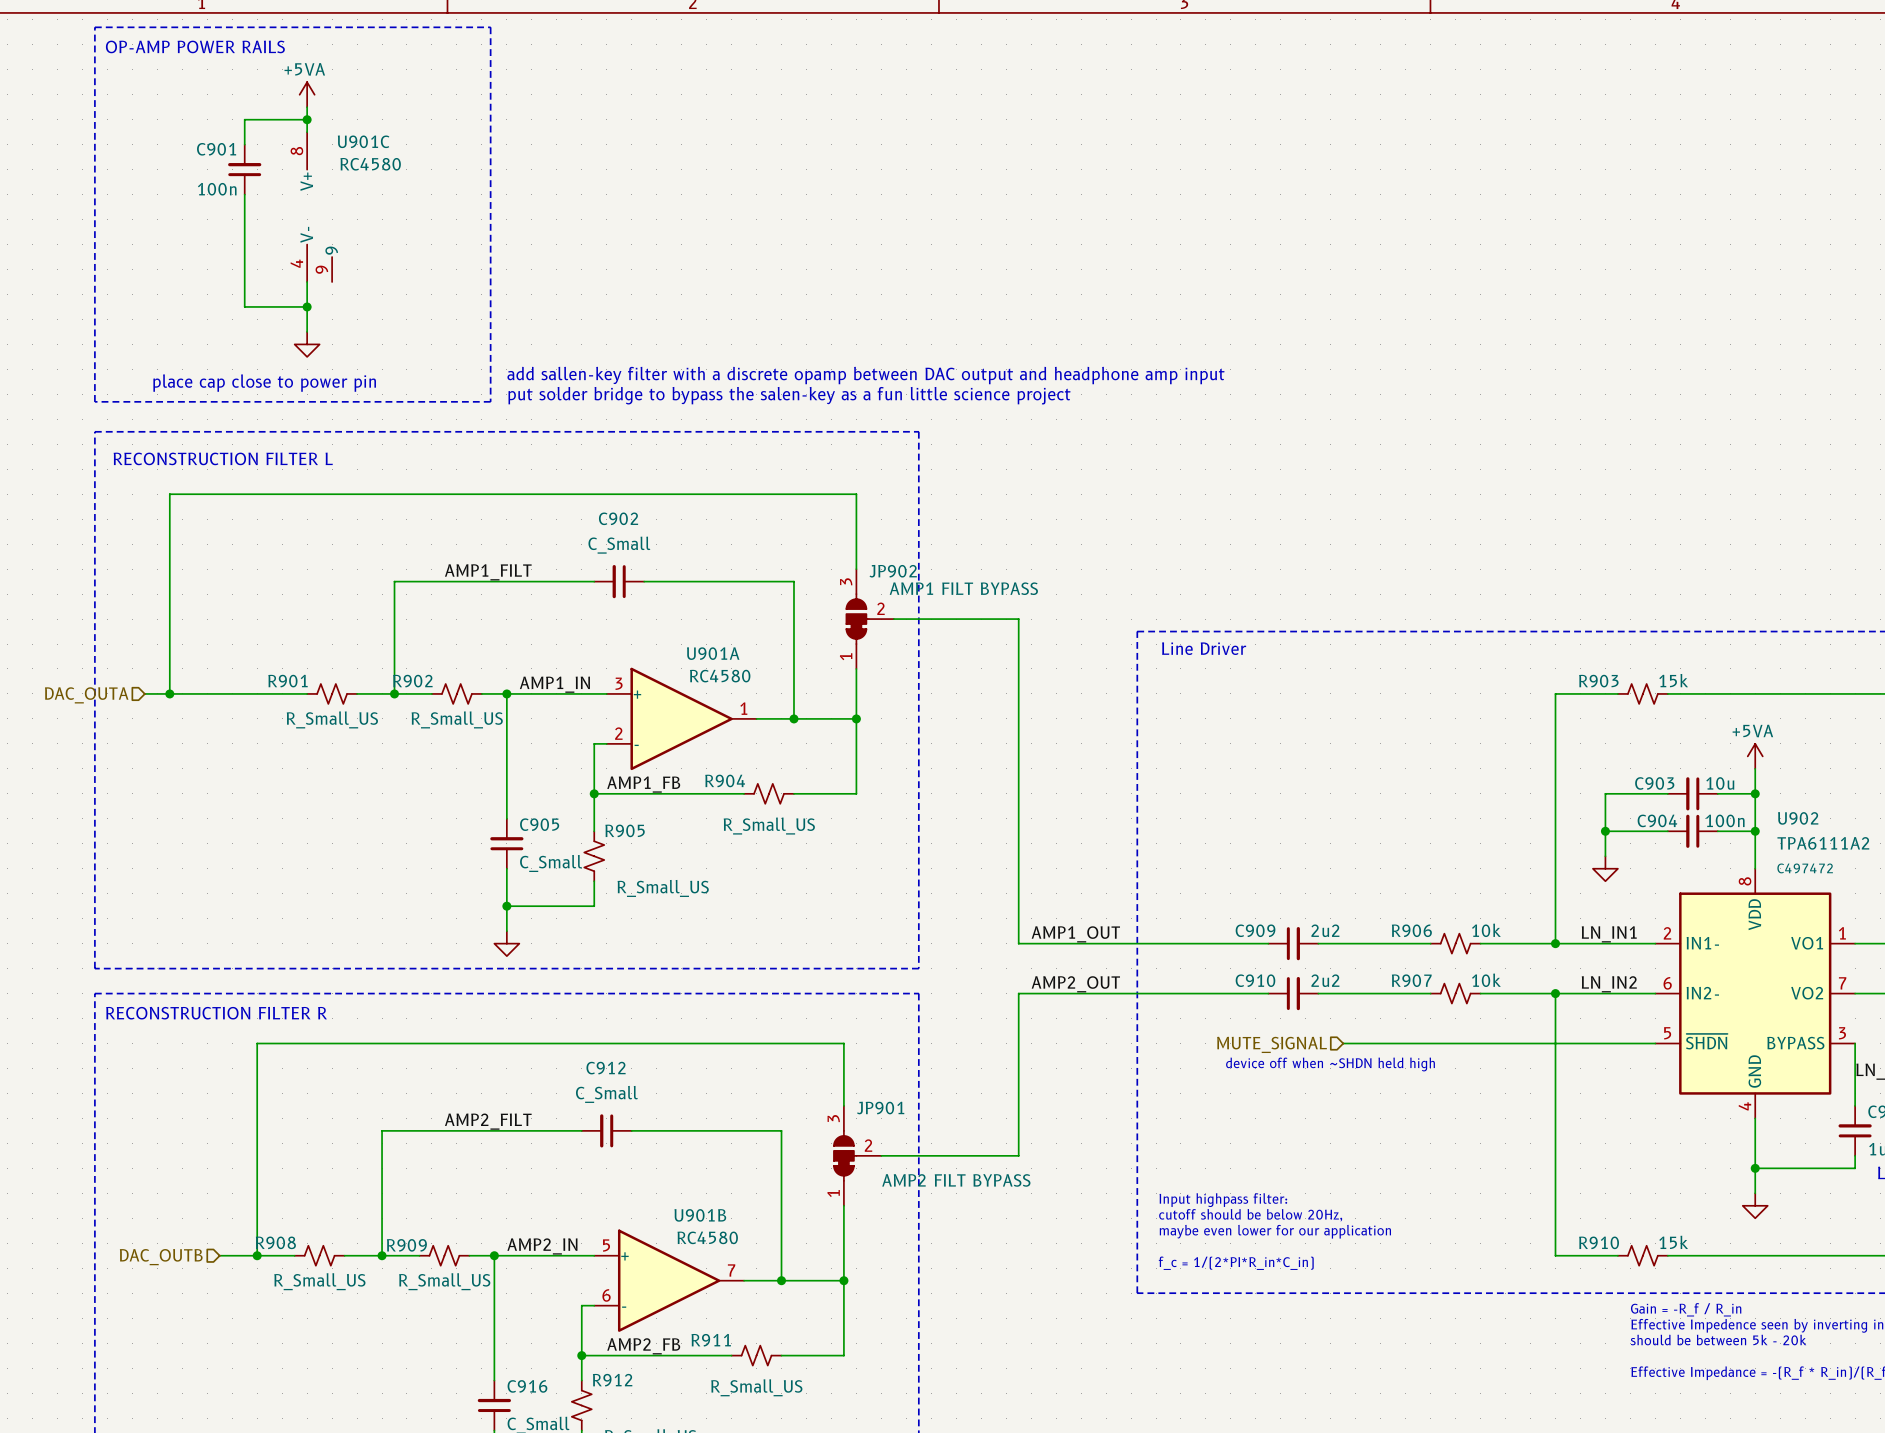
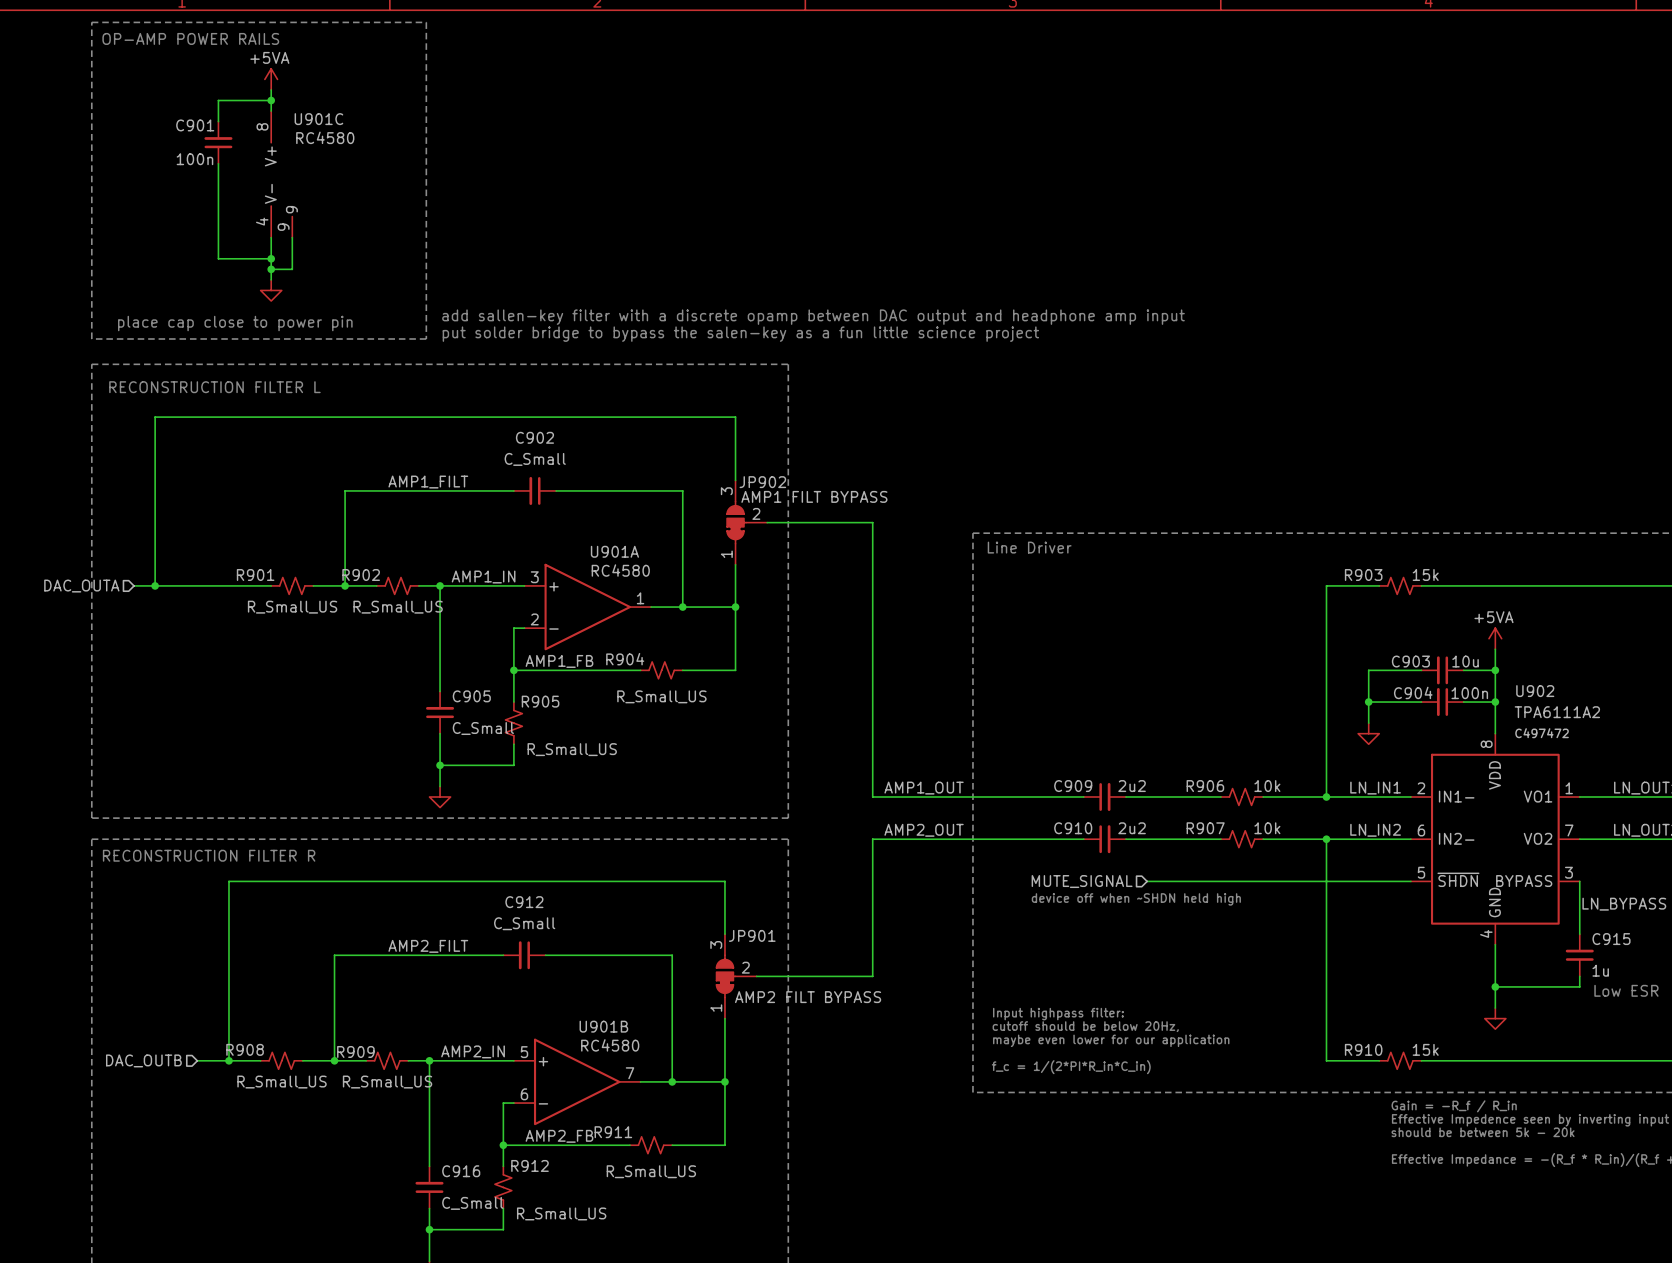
wire: none -> (292, 237) (292, 269) (271, 269)
junction: none -> (271, 269)

